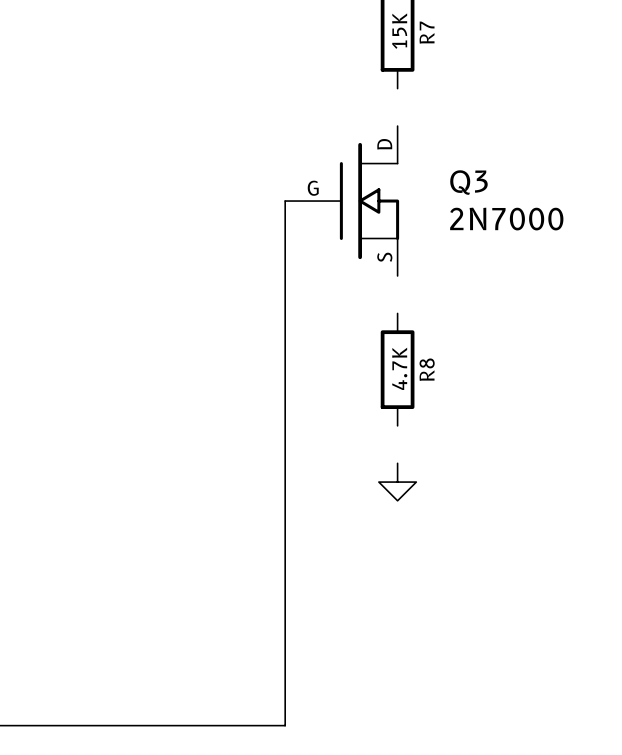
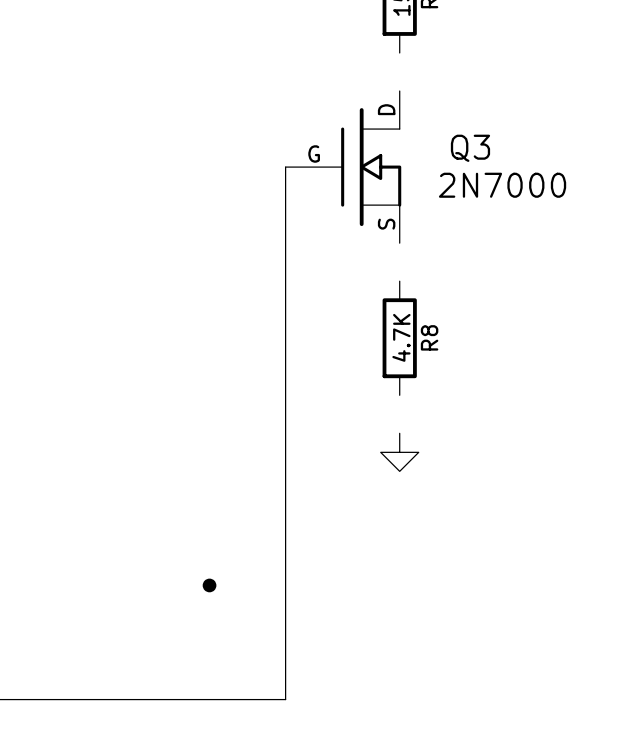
junction: none -> (209, 585)

